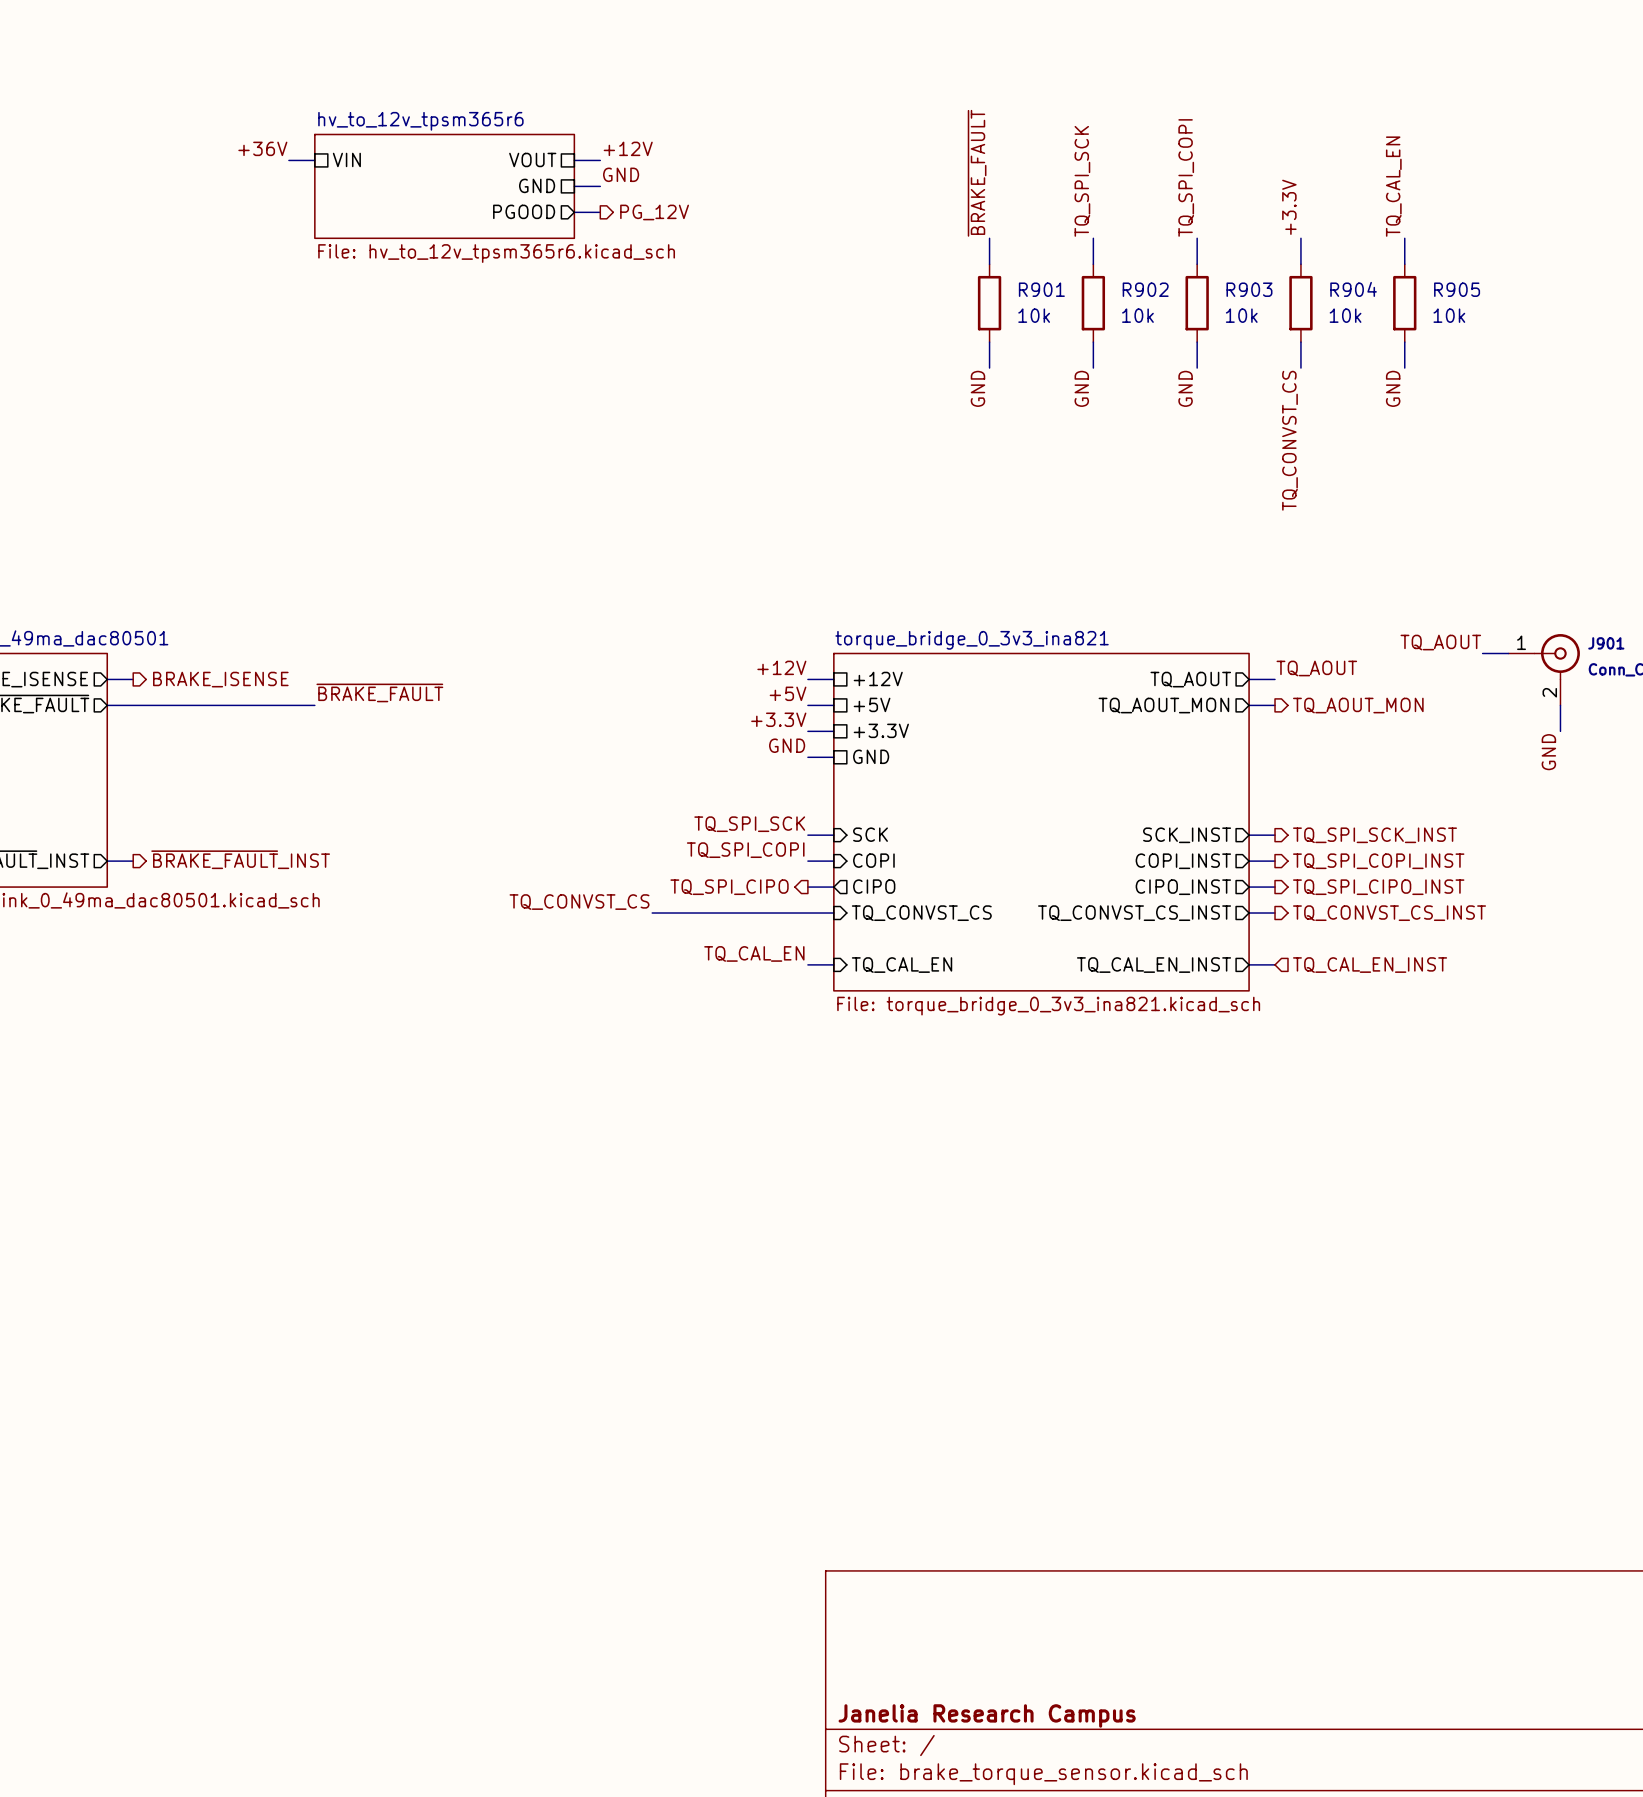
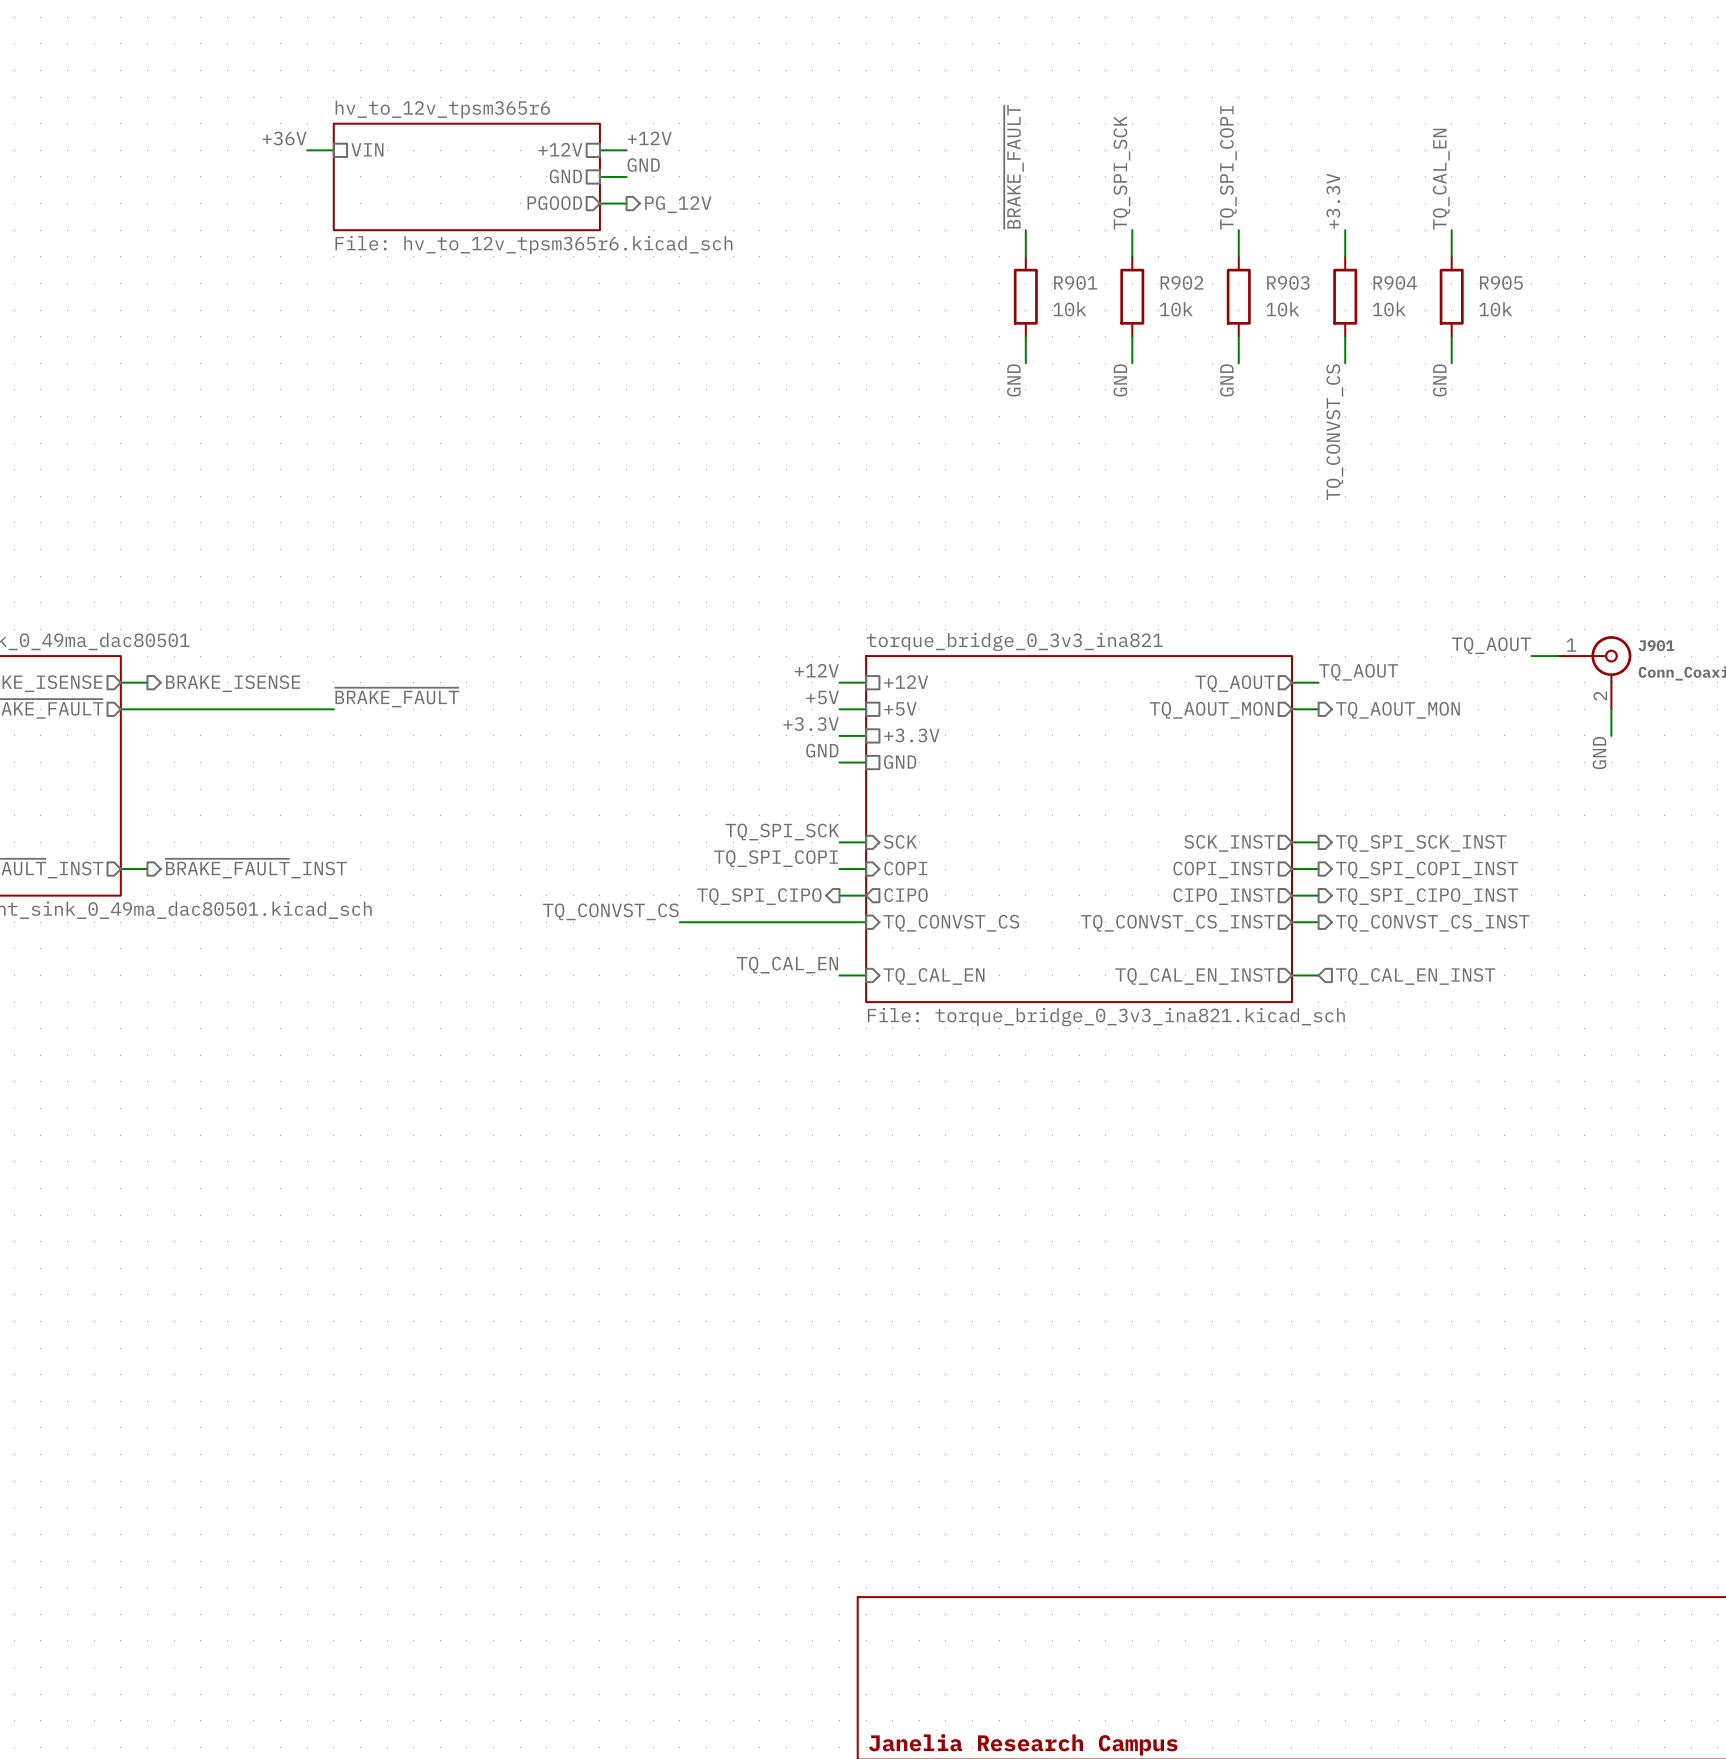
sheet pin: VOUT (532, 159) -> +12V (560, 149)

